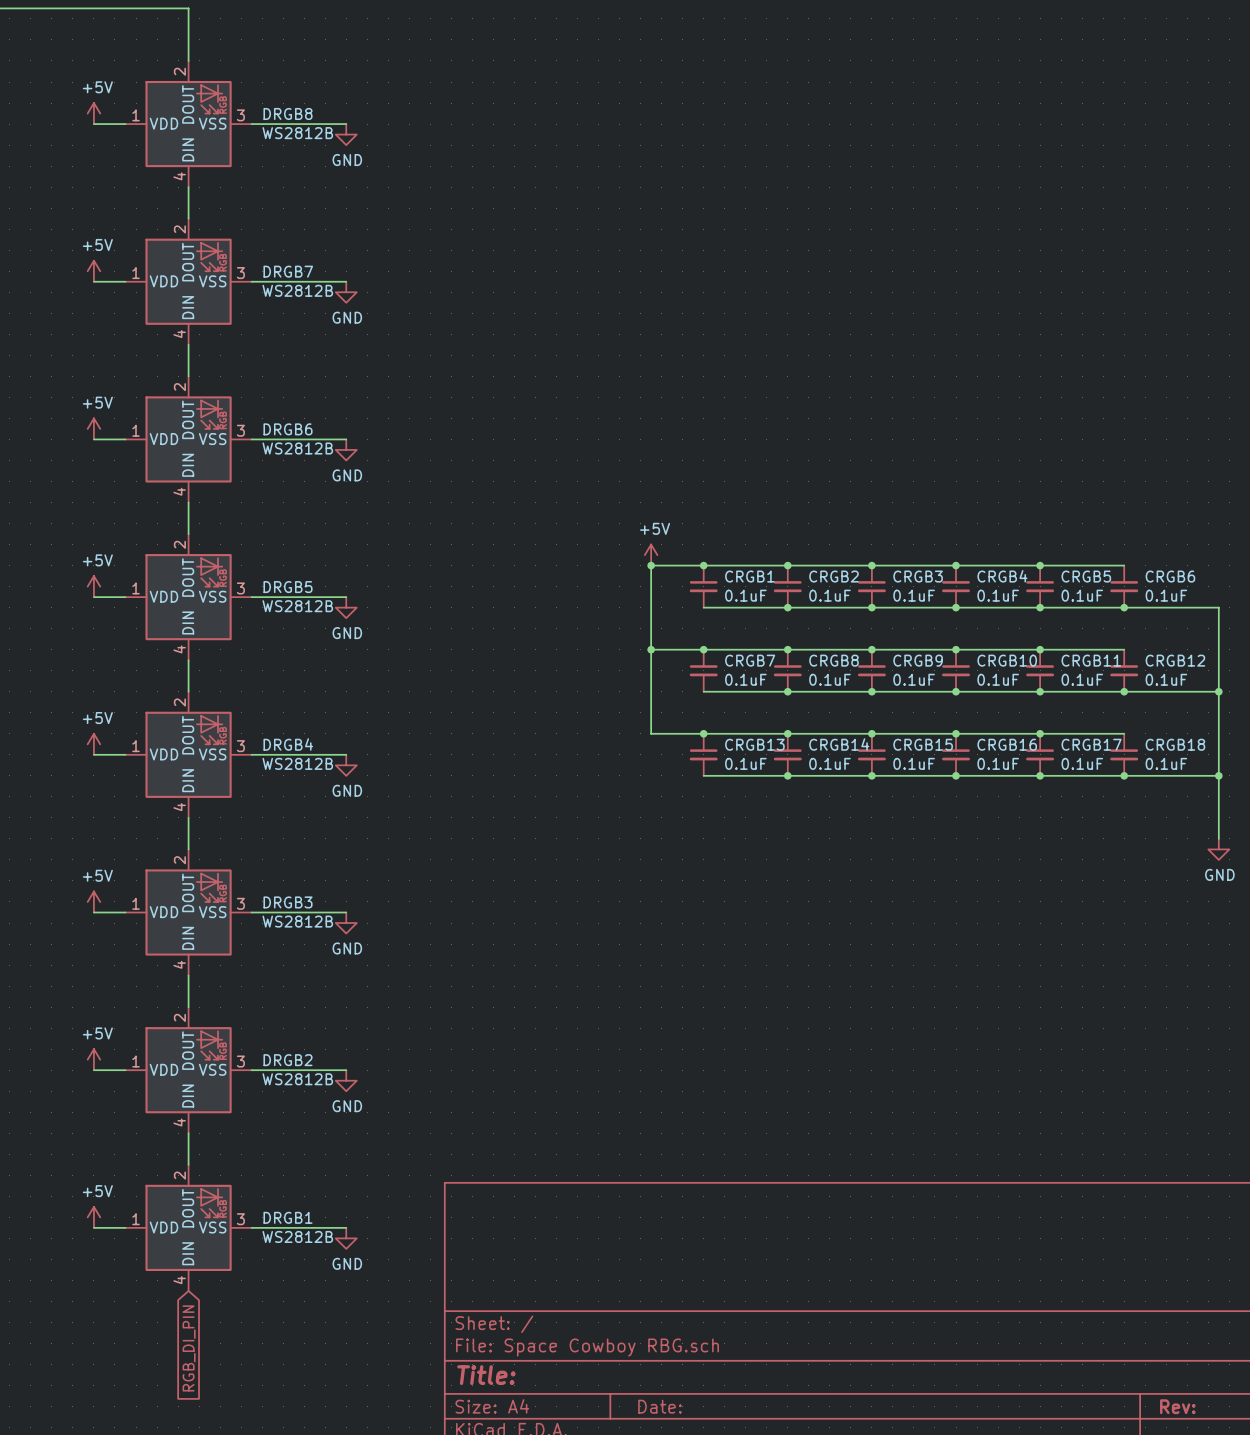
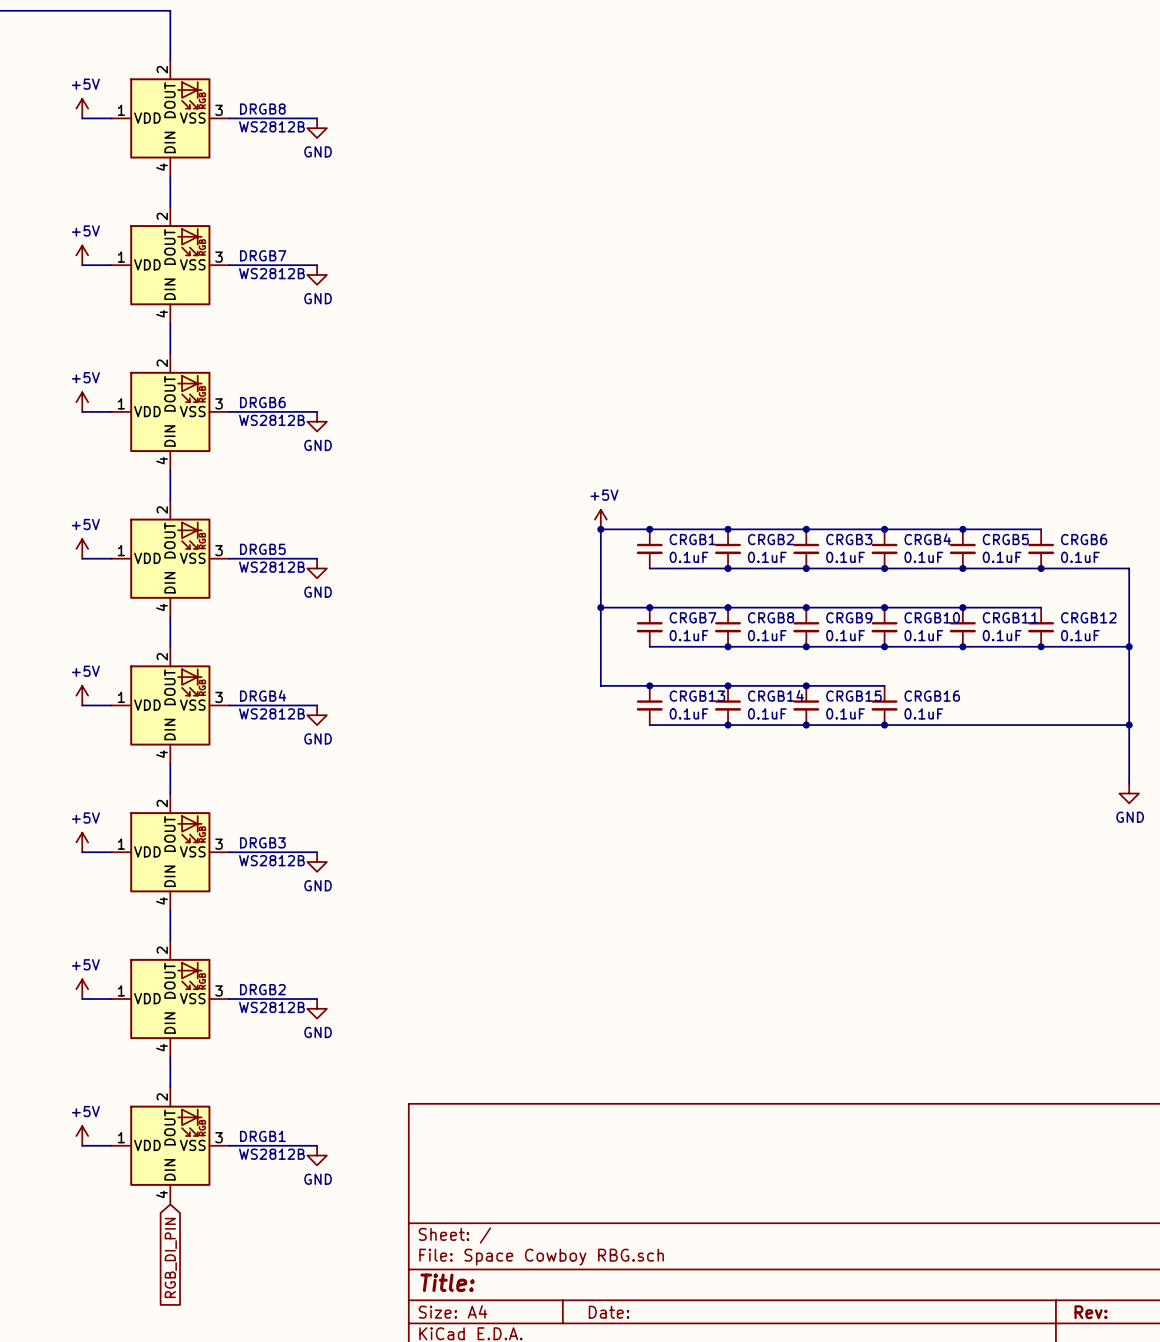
wire: (956, 733) (1124, 733) -> none
junction: (956, 733) -> none
junction: (1040, 733) -> none
CRGB17: 0.1uF (1040, 754) -> none
CRGB18: 0.1uF (1124, 754) -> none
junction: (1040, 775) -> none
junction: (1124, 775) -> none

